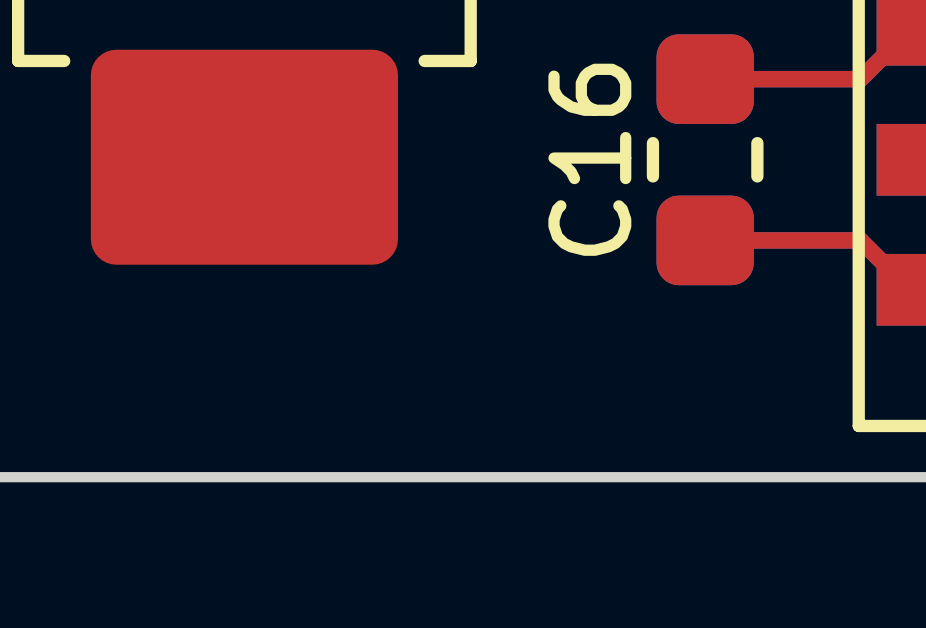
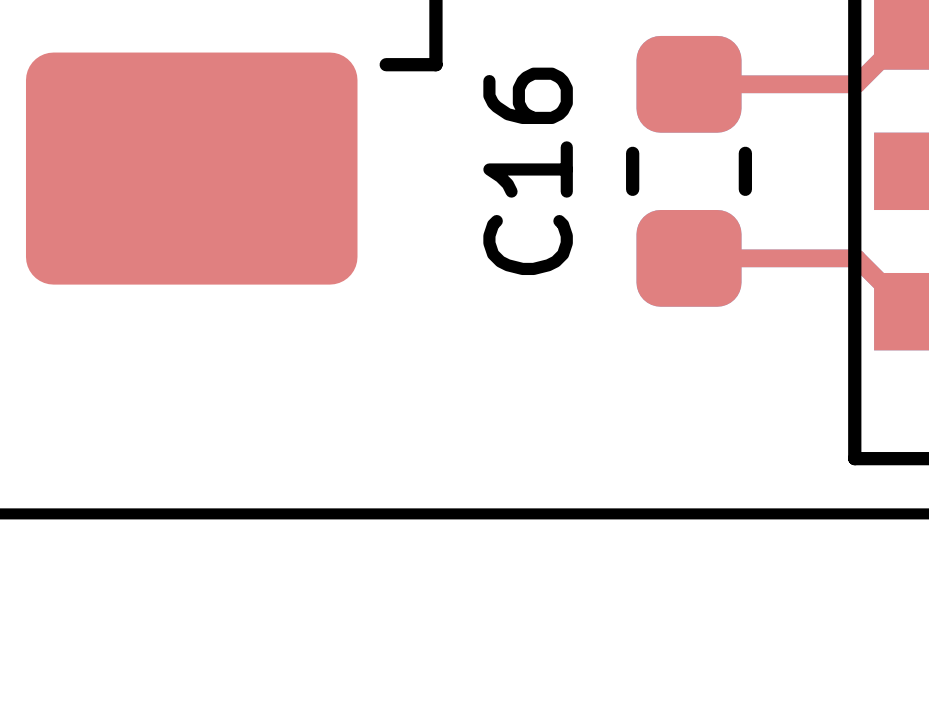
C16 name position: C16 (589, 159) -> C16 (528, 171)

